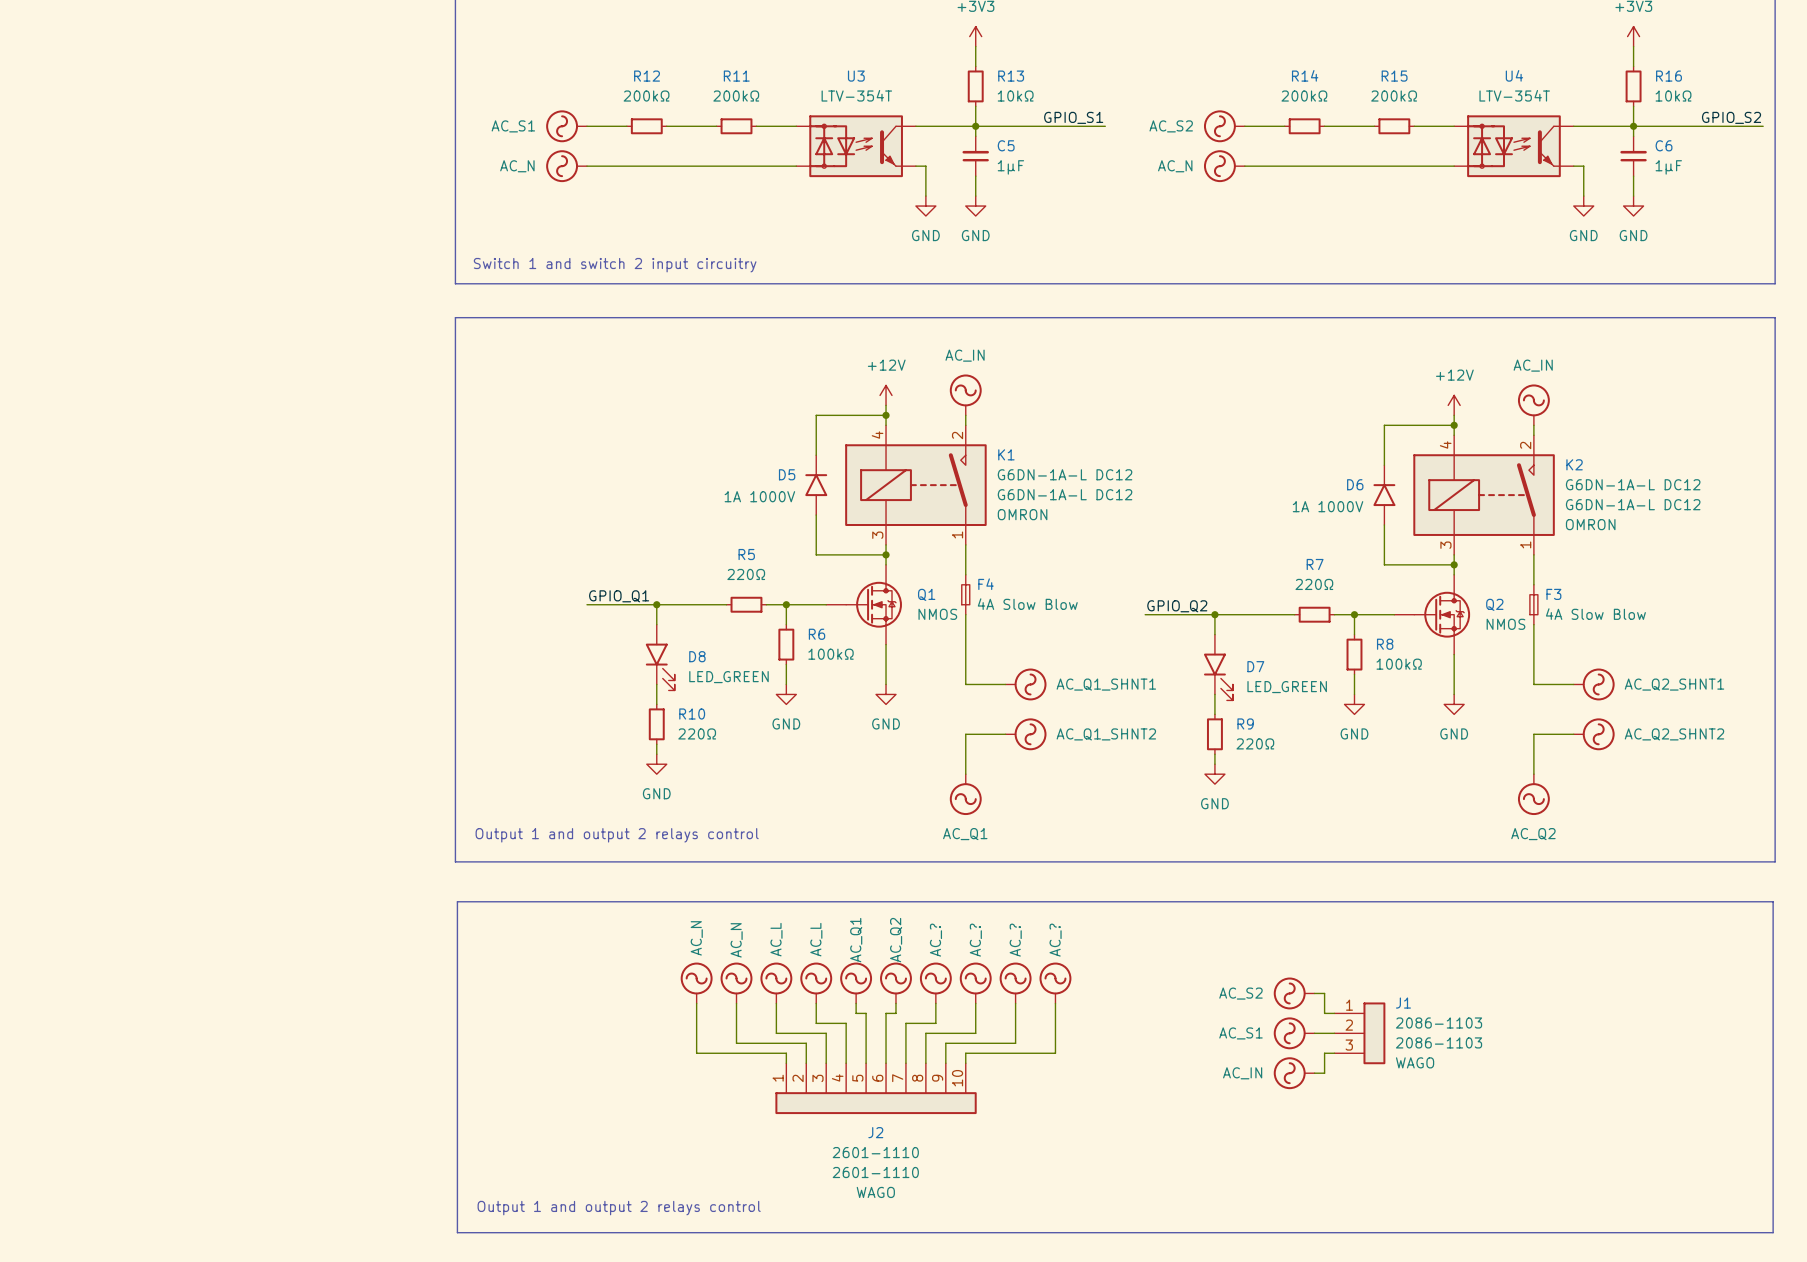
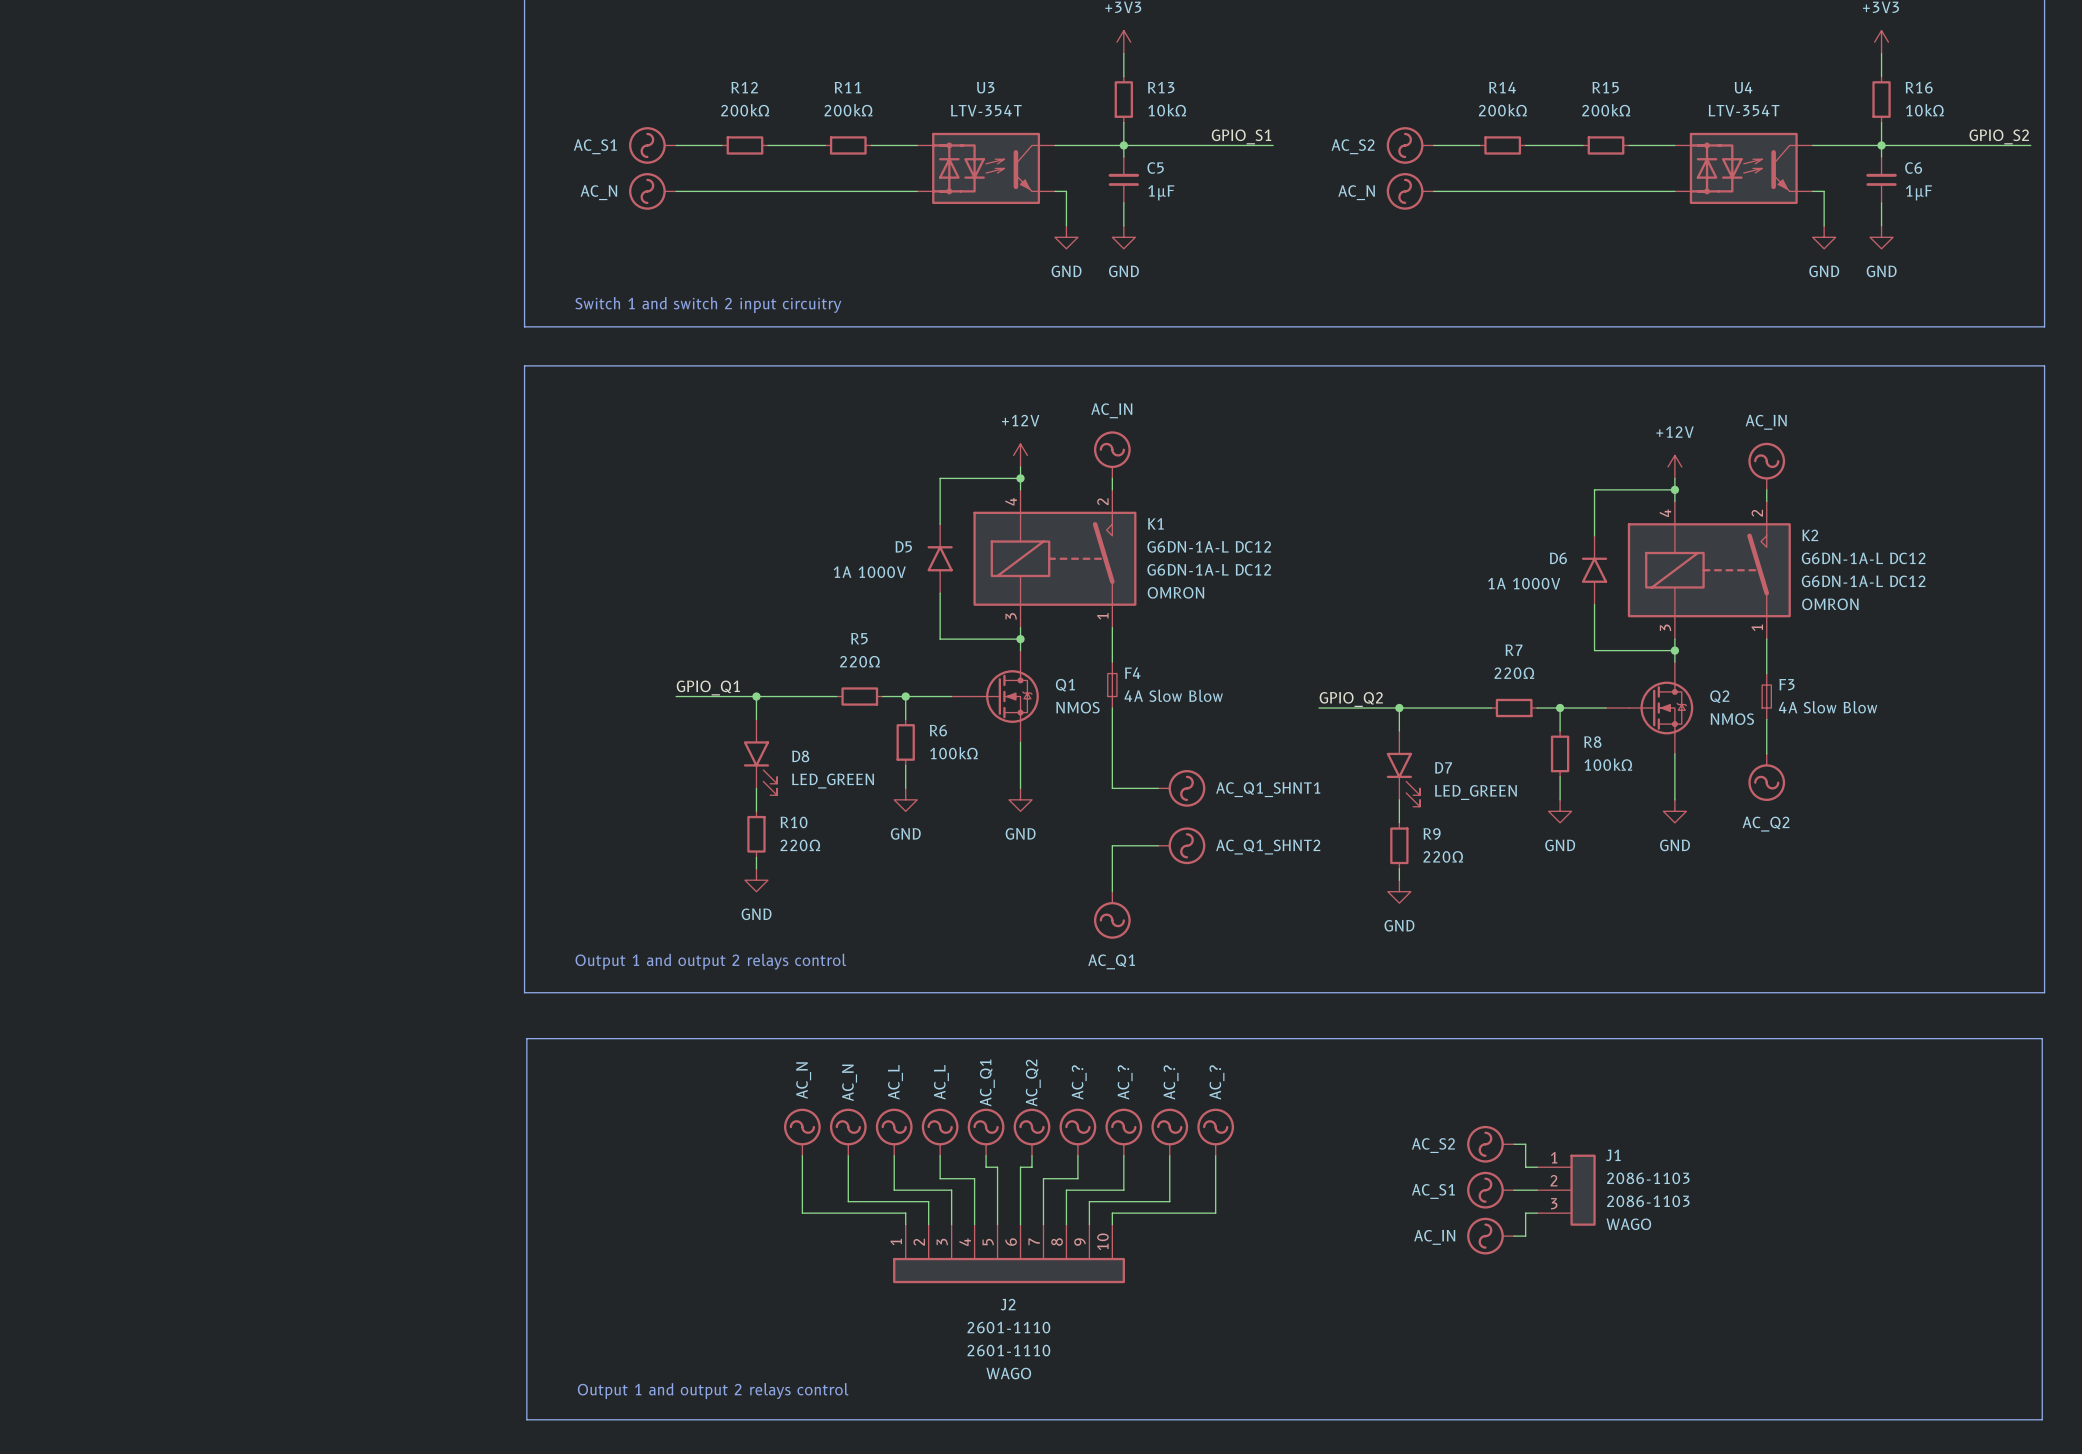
wire: (1533, 654) (1533, 684) (1573, 684) -> none
power symbol: AC_Q2_SHNT1 (1594, 684) -> none
wire: (1573, 734) (1533, 734) (1533, 774) -> none
power symbol: AC_Q2_SHNT2 (1594, 734) -> none
power symbol position: AC_Q2 (1533, 794) -> AC_Q2 (1766, 777)

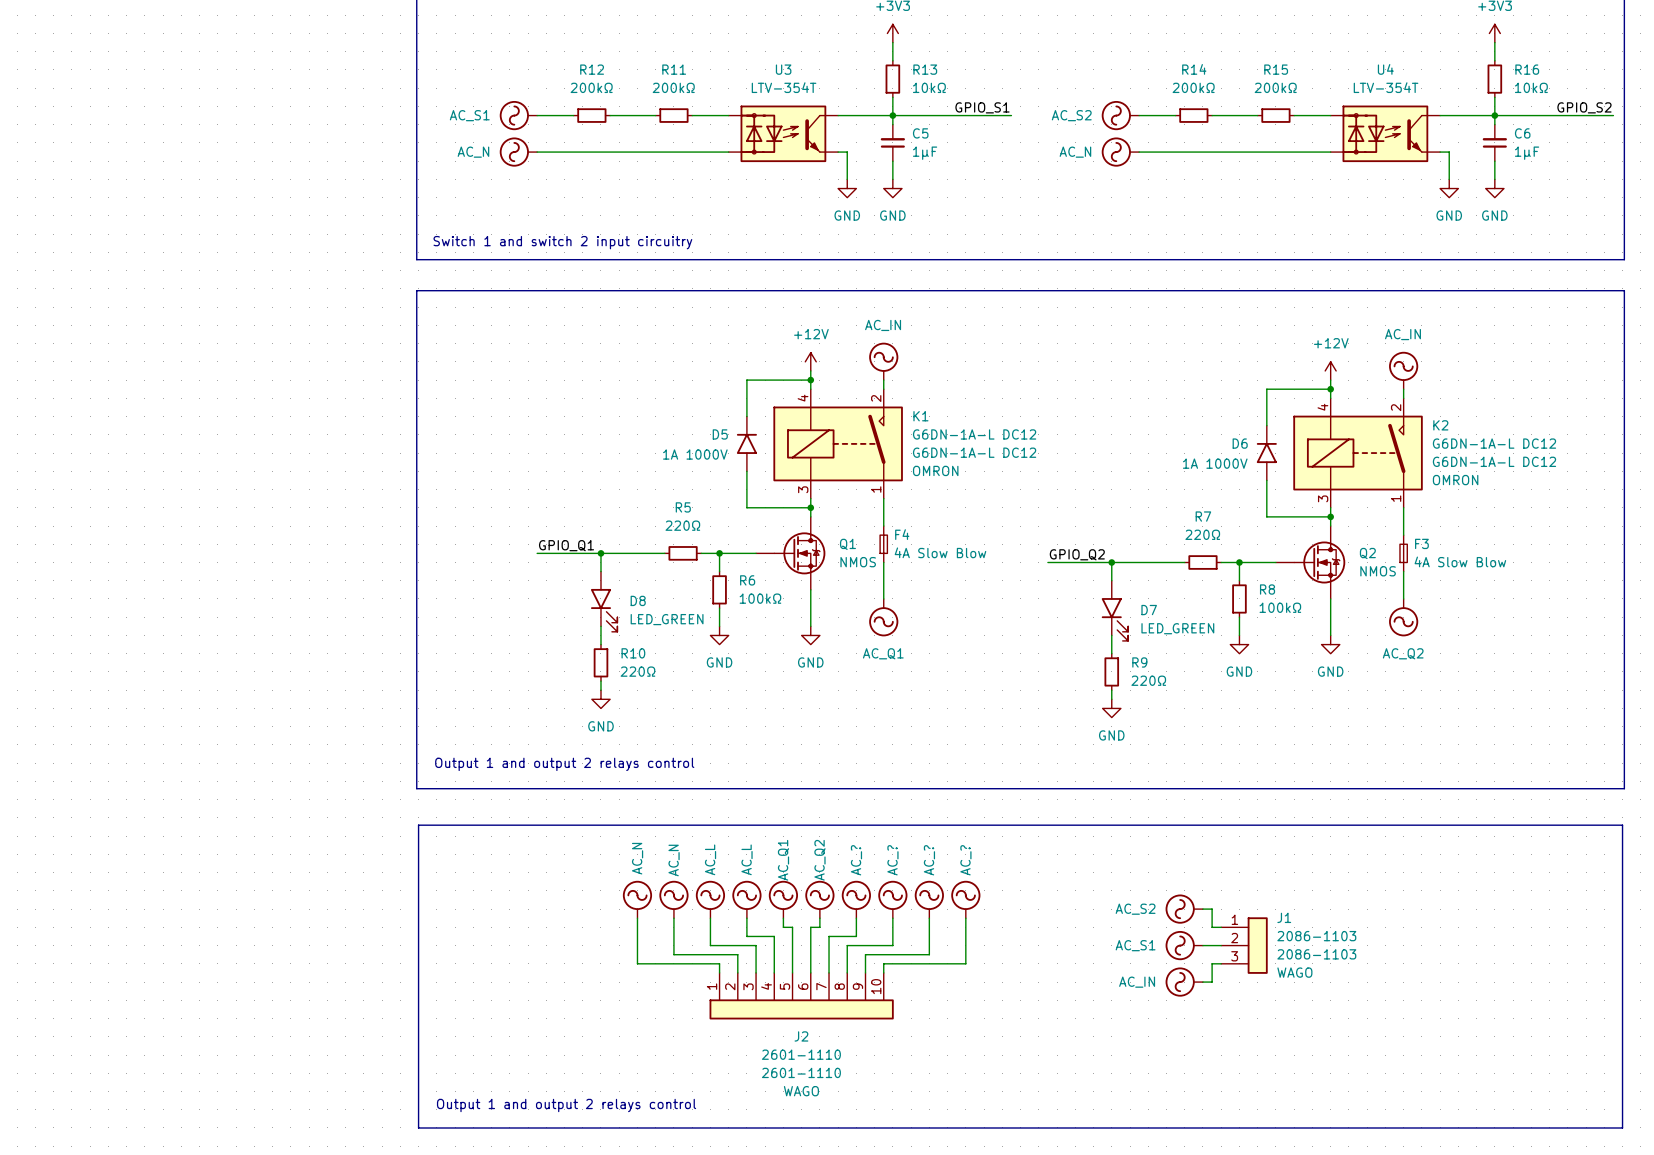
wire: (1112, 753) (1112, 788) (1158, 788) -> none
power symbol: AC_Q1_SHNT1 (1181, 788) -> none
wire: (1158, 845) (1112, 845) (1112, 891) -> none
power symbol: AC_Q1_SHNT2 (1181, 845) -> none
power symbol position: AC_Q1 (1112, 915) -> AC_Q1 (883, 617)

